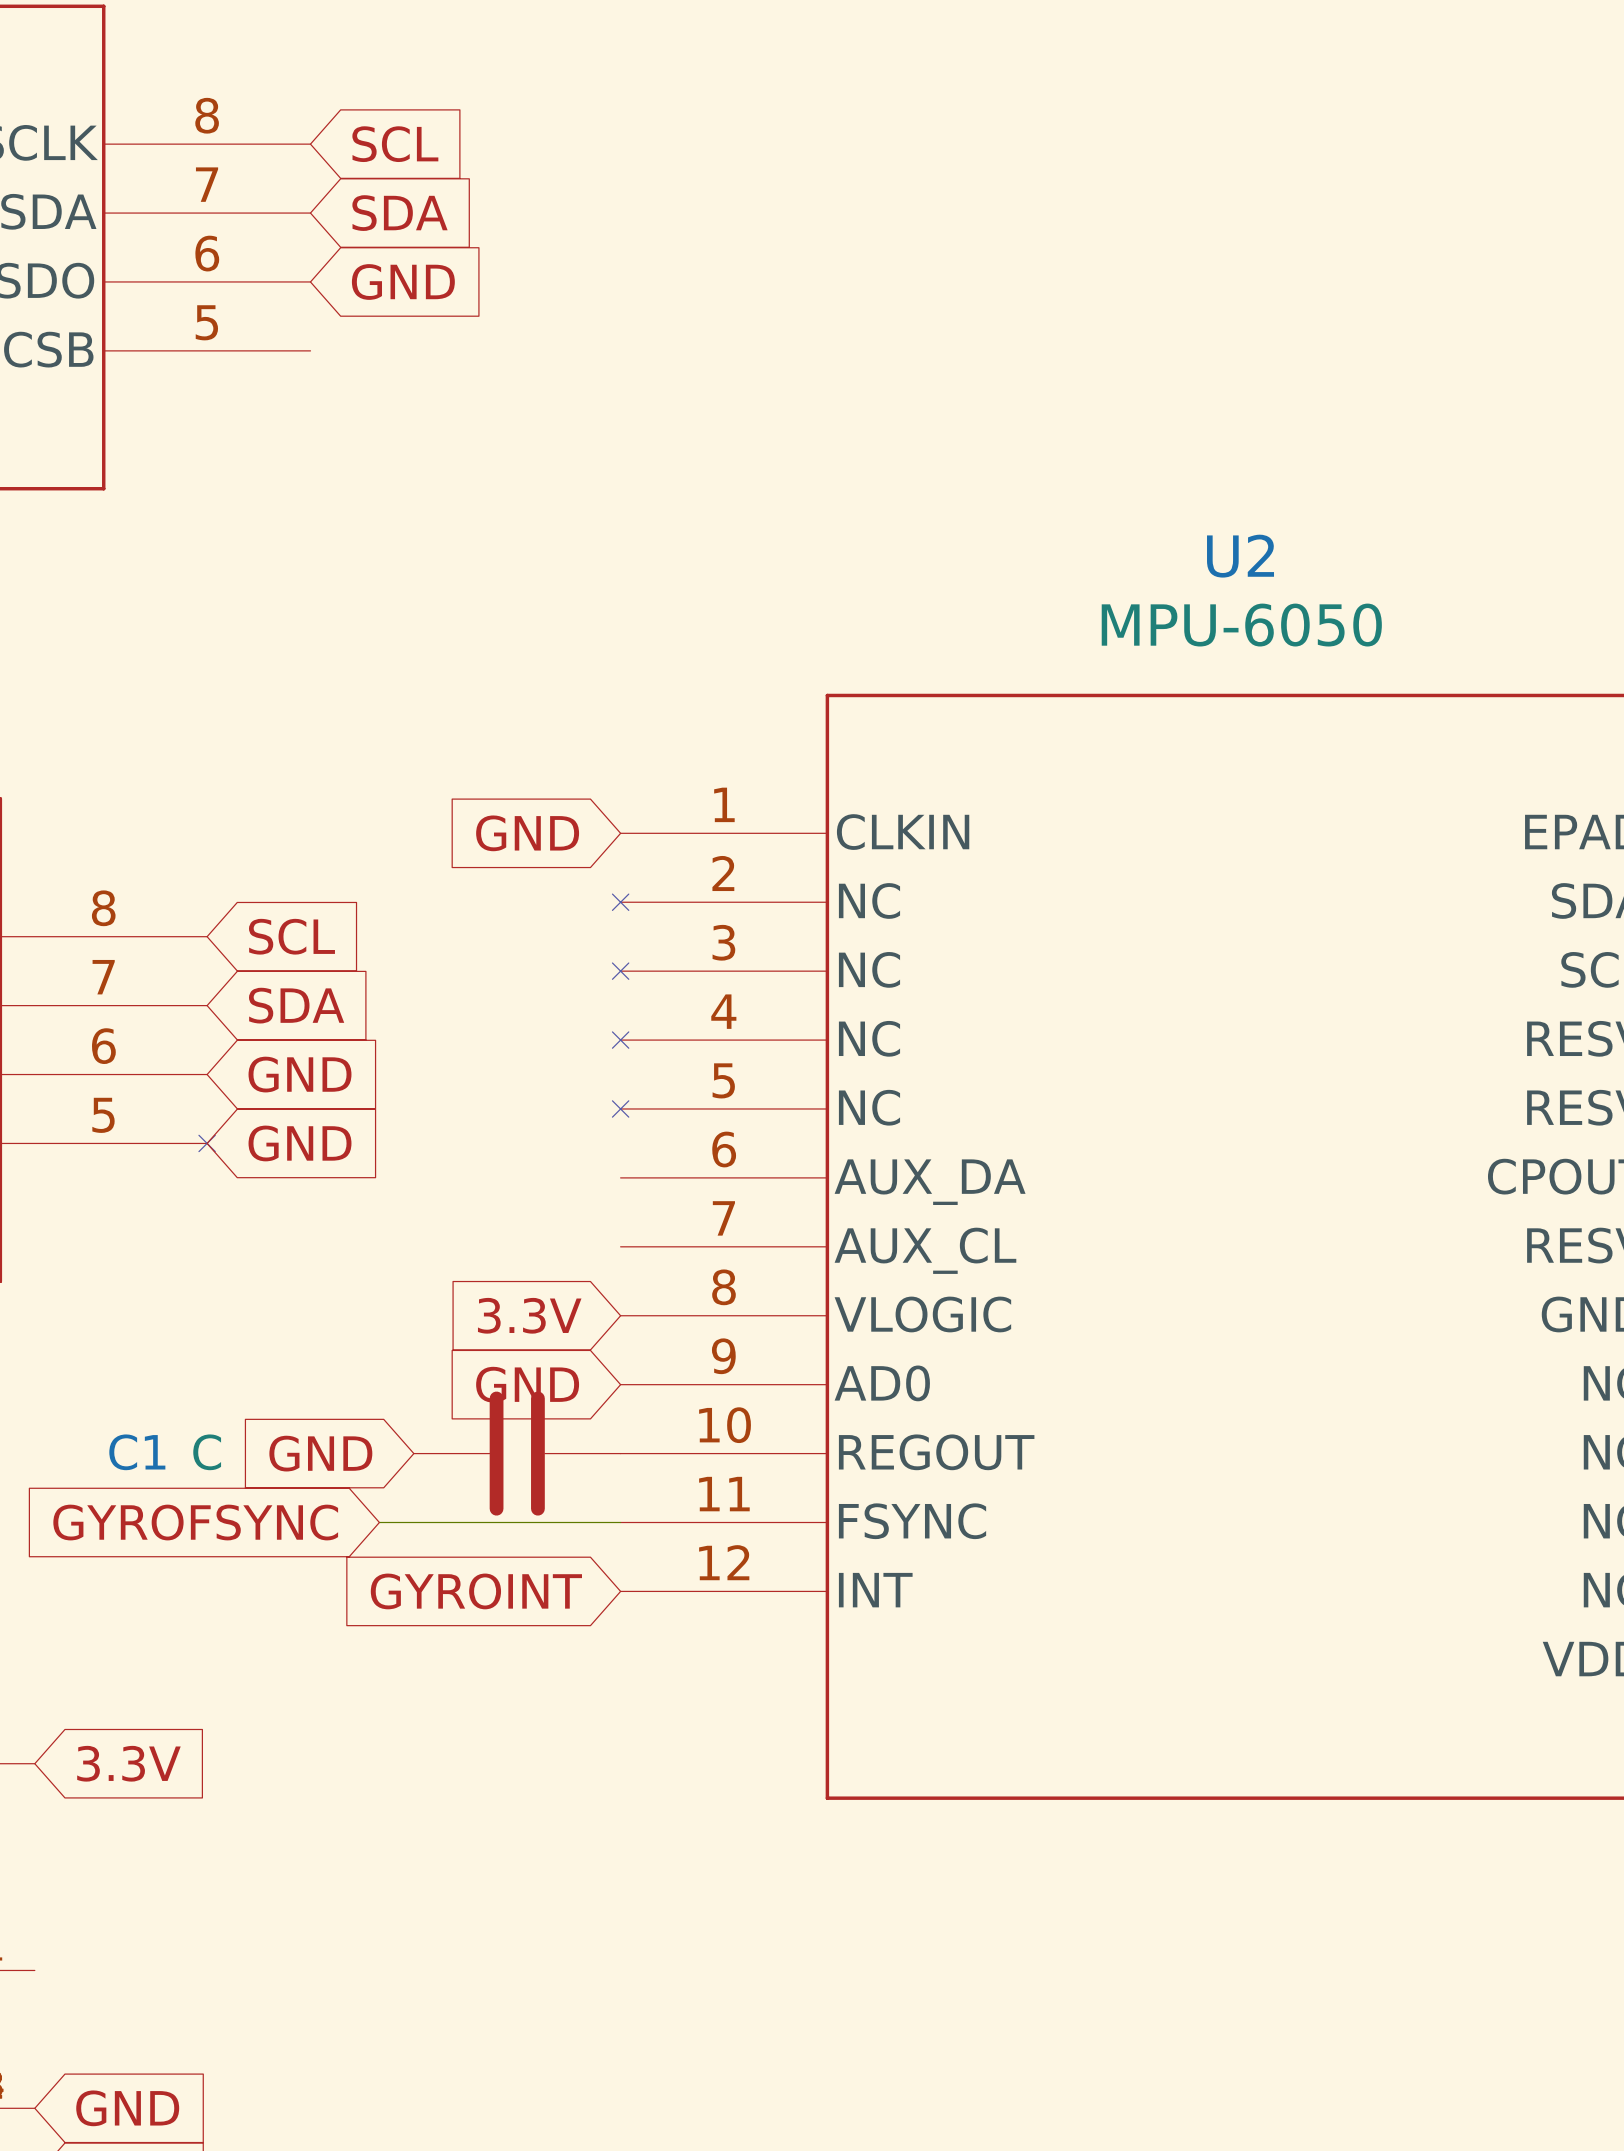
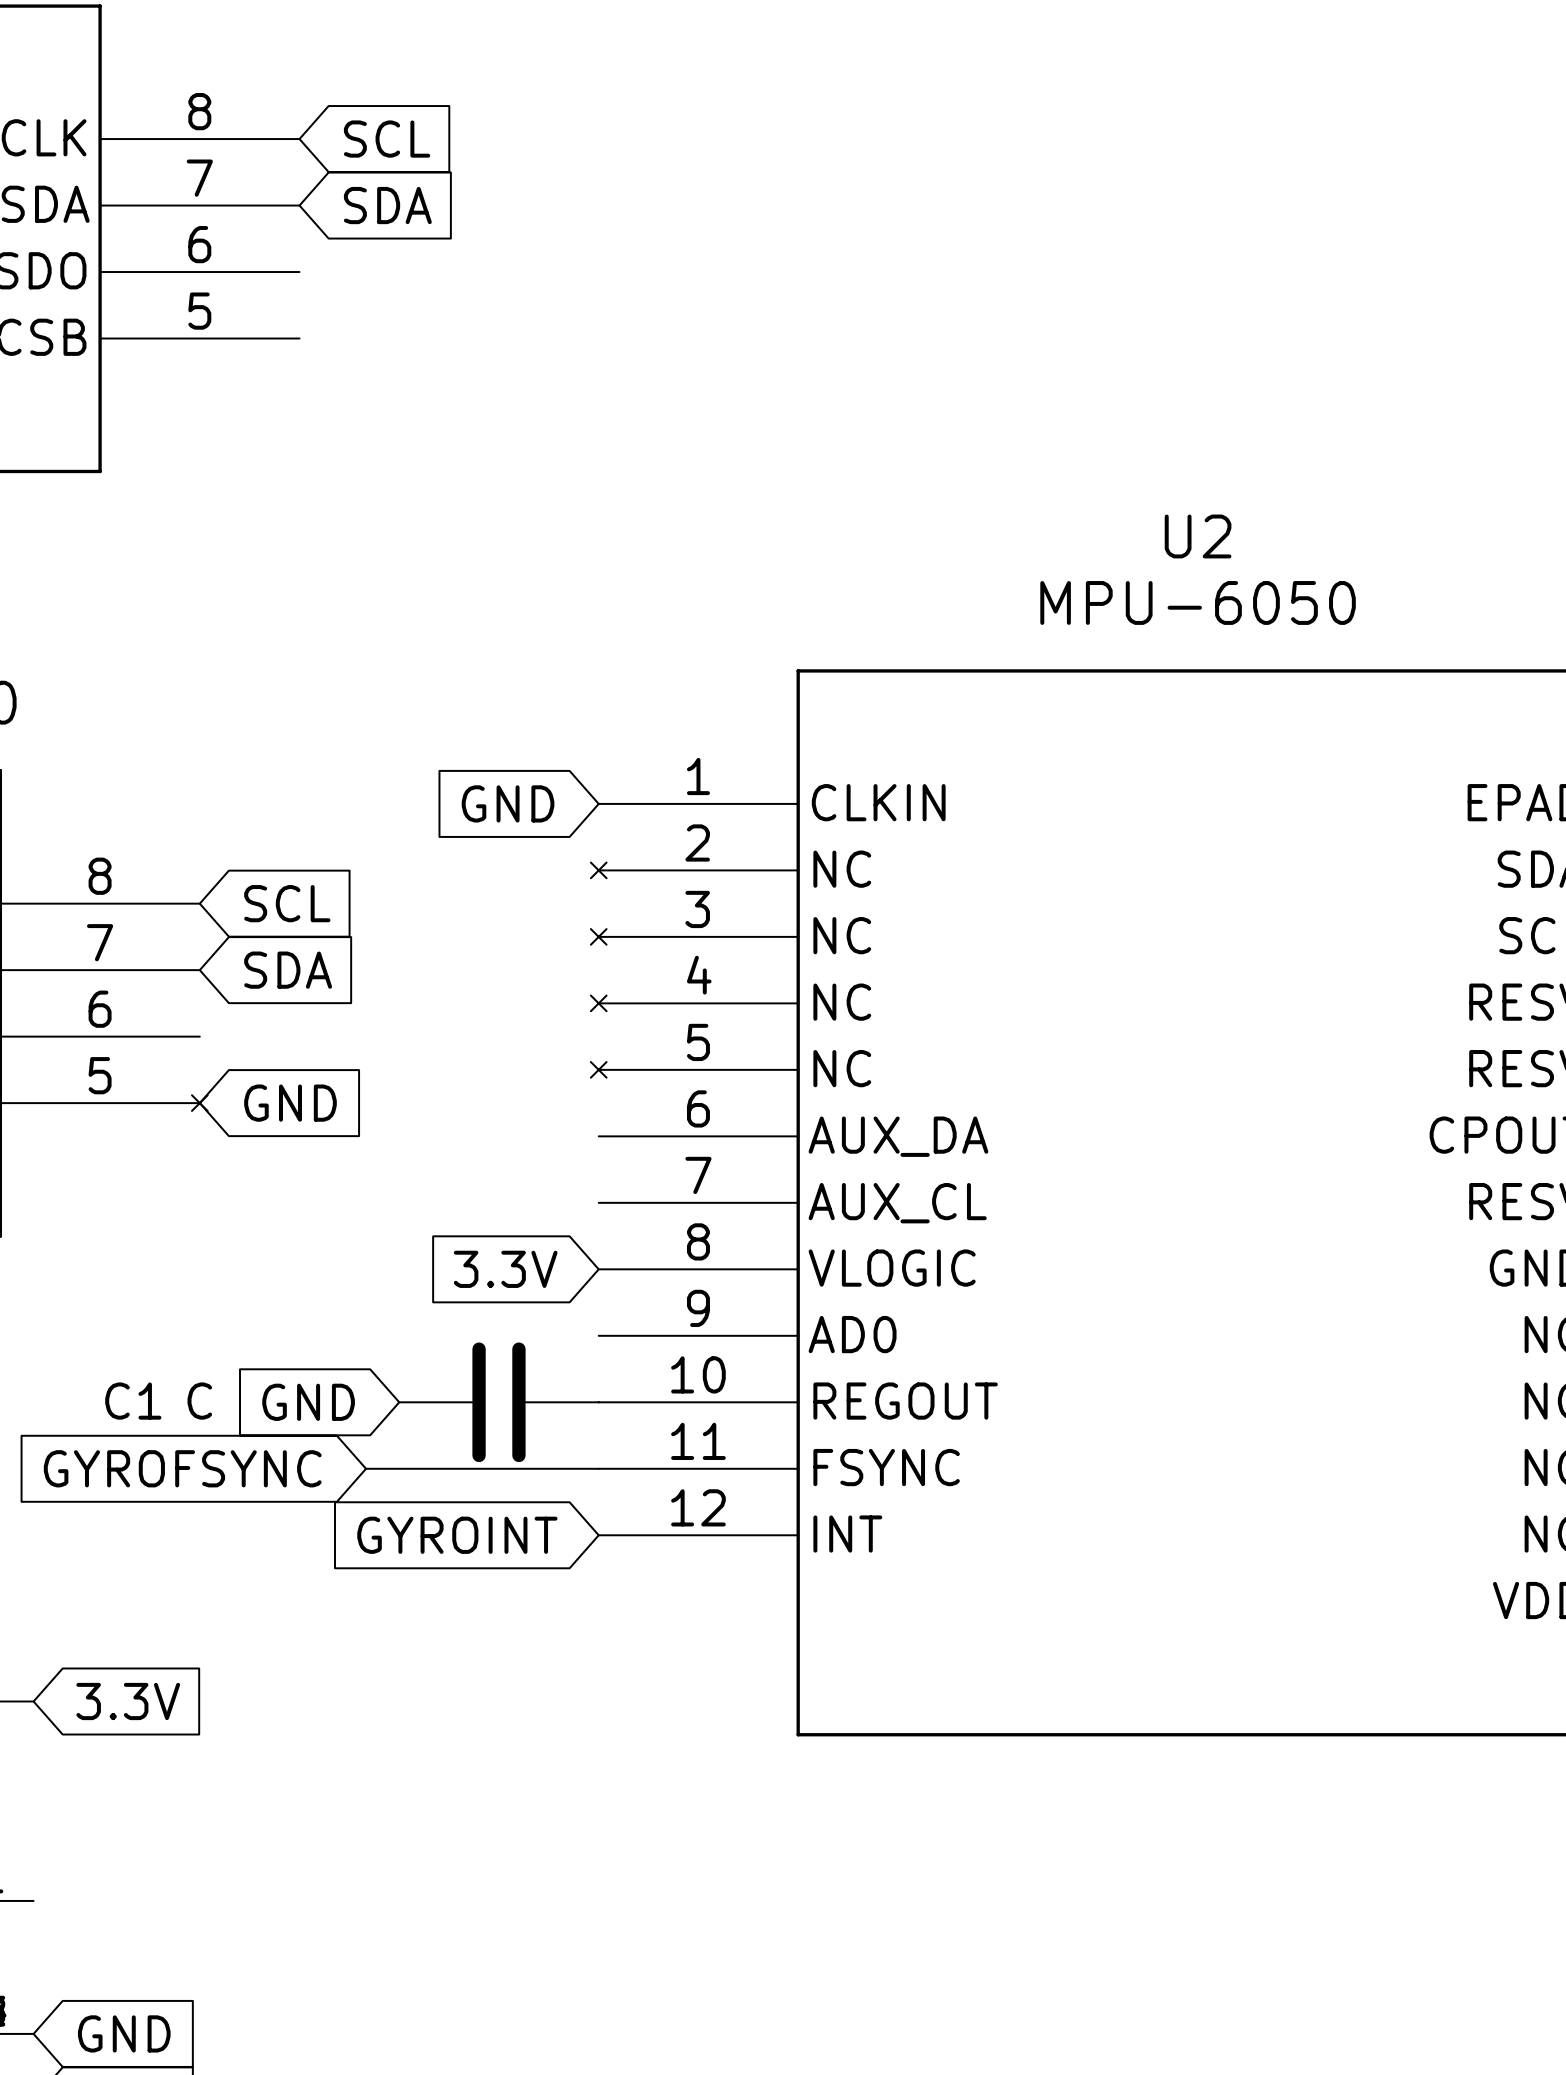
global label: GND (403, 281) -> none
global label: GND (300, 1074) -> none
global label: GND (527, 1384) -> none

